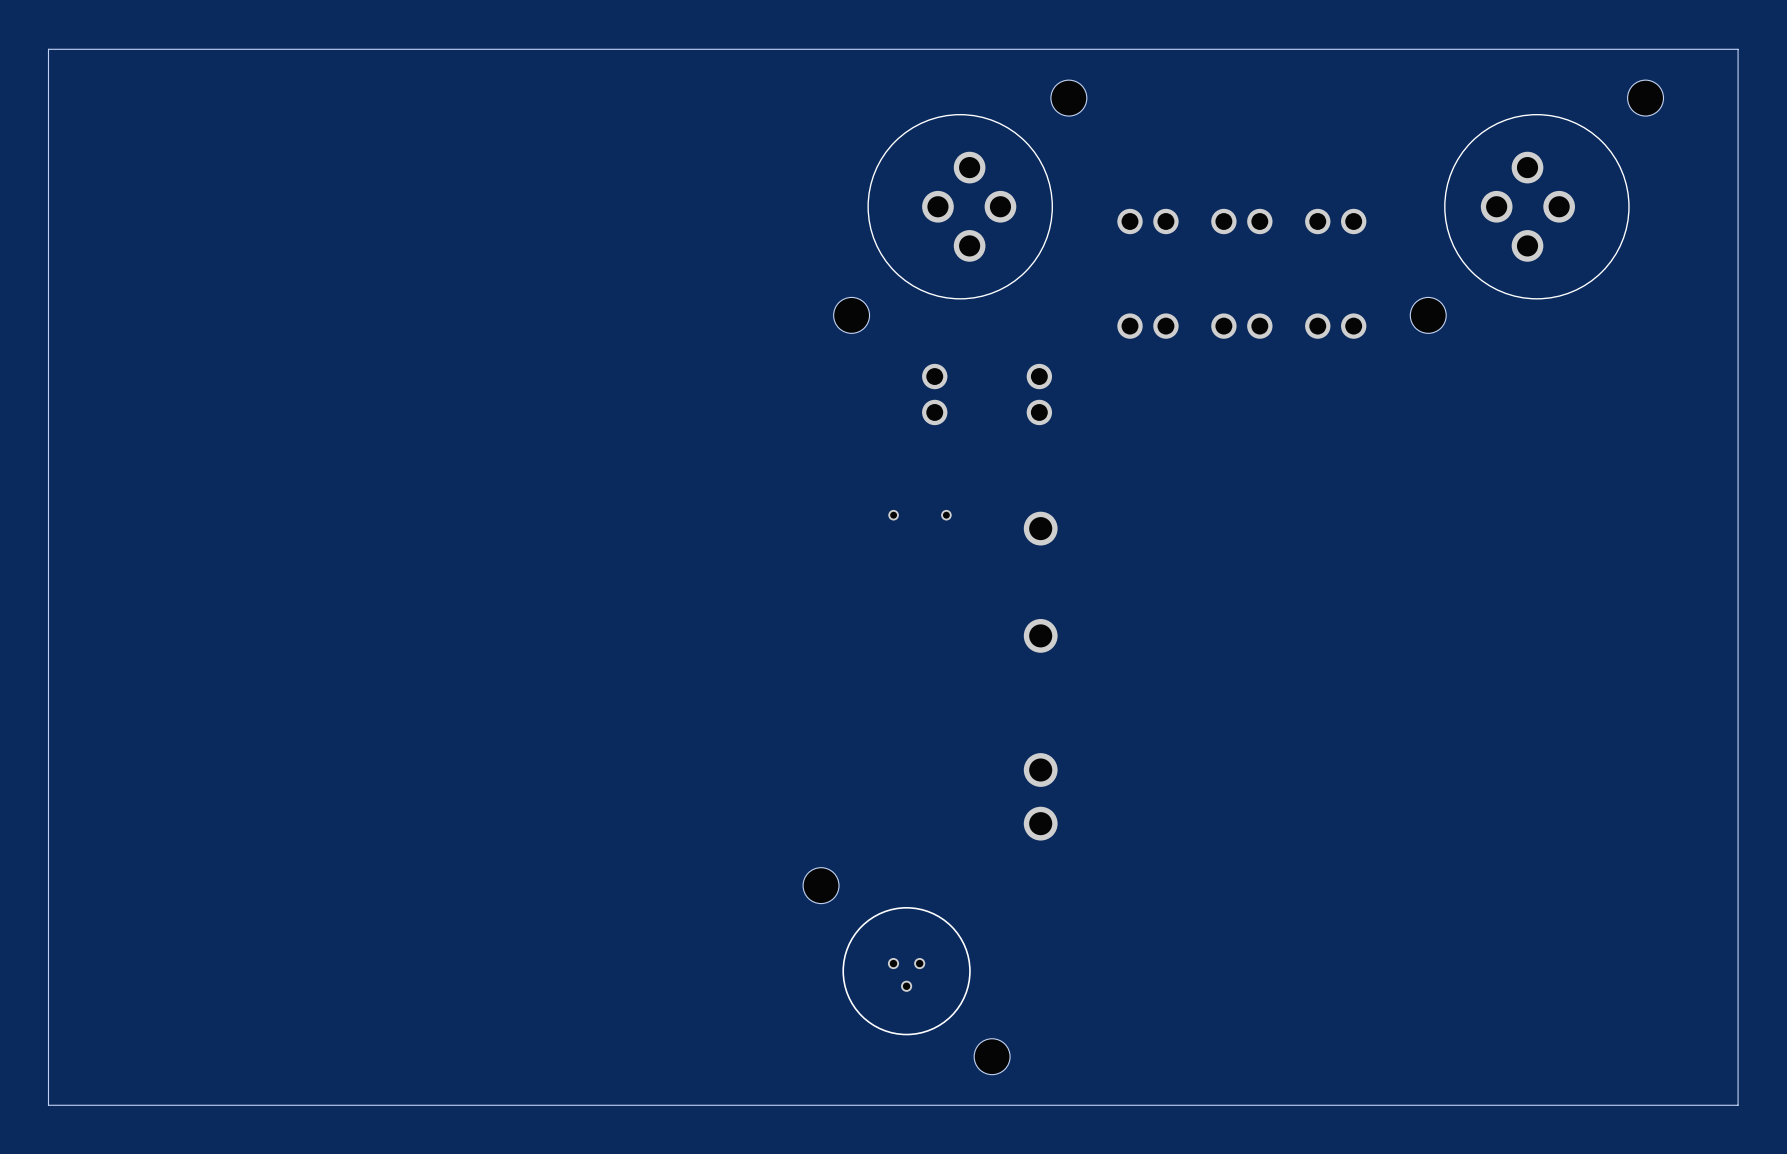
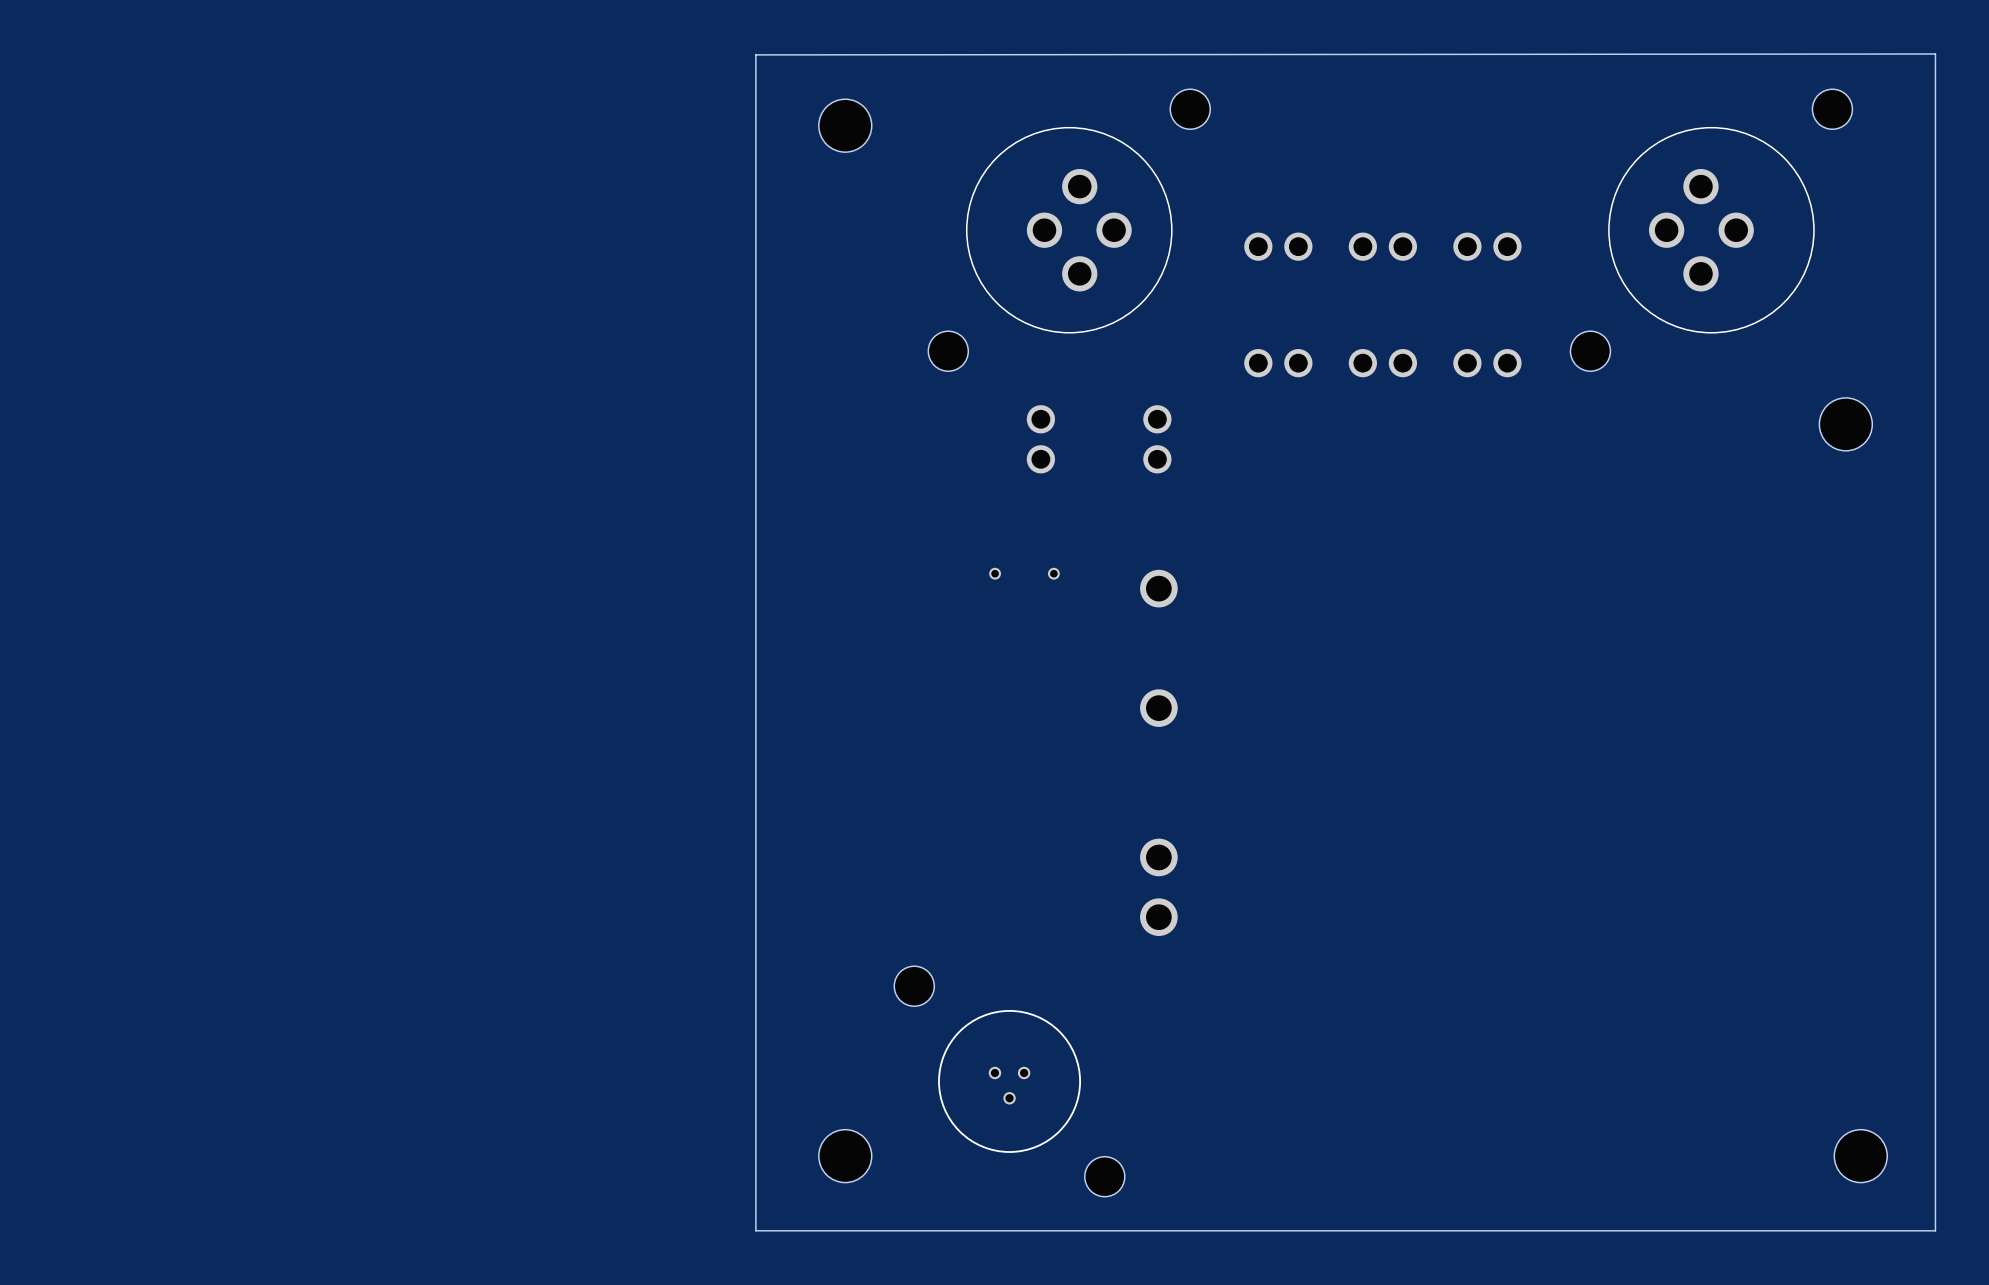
board edge: (1738, 49) (48, 49) (48, 1105) (678, 1105) -> (1935, 54) (755, 54) (755, 1230)
part: none -> (845, 125)
part: none -> (1845, 424)
part: none -> (845, 1156)
part: none -> (1860, 1156)

